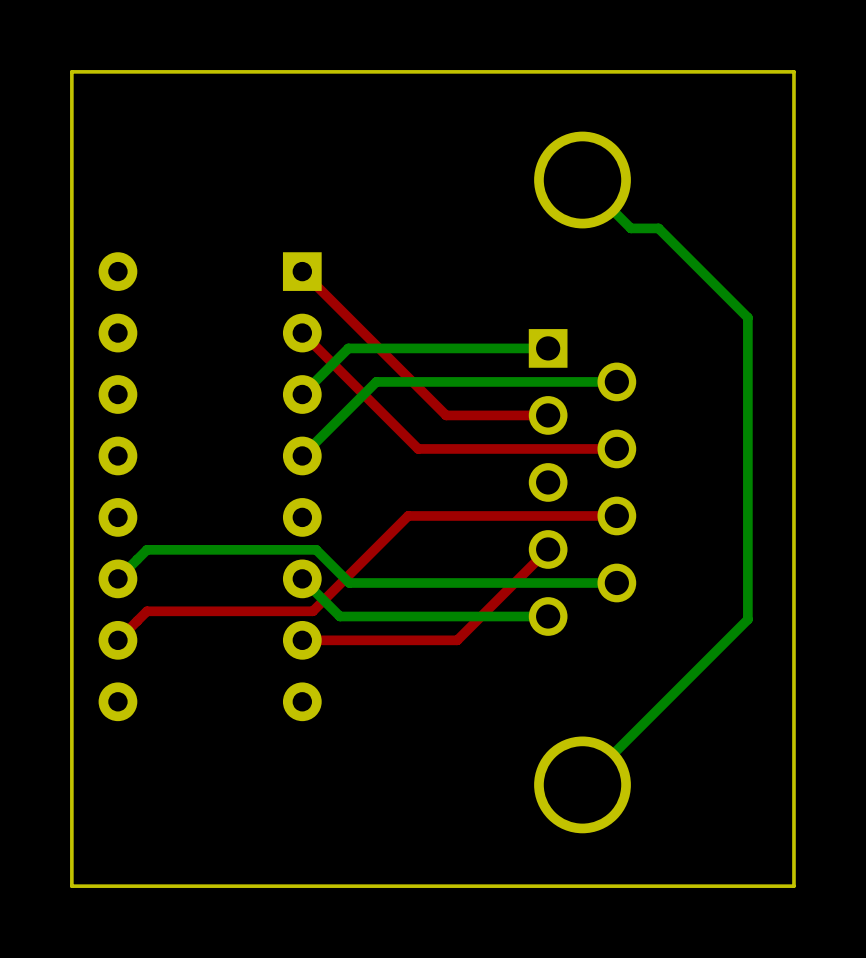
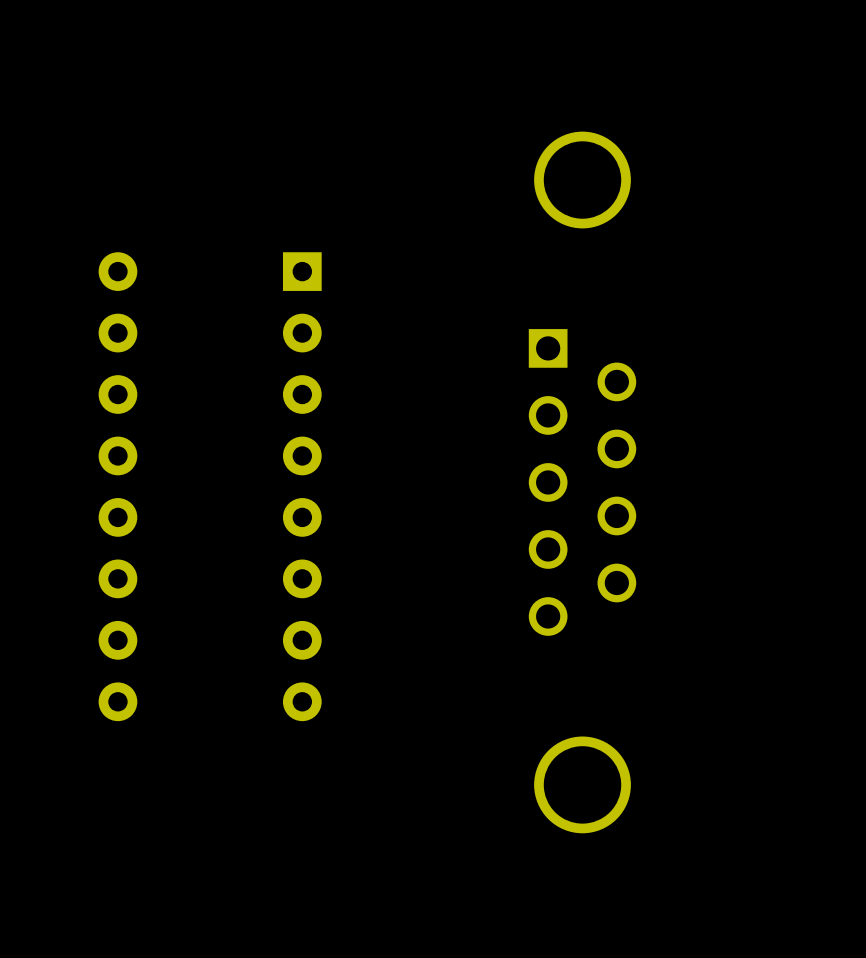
board edge: (793, 71) (71, 71) (71, 886) (793, 886) (793, 71) -> none
bottom track: (582, 180) (630, 228) (658, 228) (747, 317) (747, 619) (582, 784) -> none
top track: (302, 271) (446, 415) (548, 415) -> none
top track: (302, 333) (418, 448) (616, 448) -> none
bottom track: (548, 348) (348, 348) (302, 394) -> none
bottom track: (616, 381) (376, 381) (302, 455) -> none
top track: (616, 515) (408, 515) (312, 611) (146, 611) (117, 640) -> none
top track: (548, 549) (457, 640) (302, 640) -> none
bottom track: (117, 578) (146, 549) (316, 549) (349, 582) (616, 582) -> none
bottom track: (302, 578) (339, 616) (548, 616) -> none

